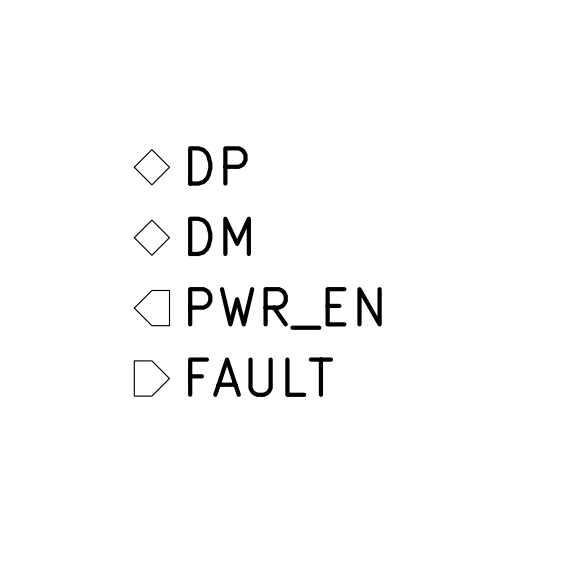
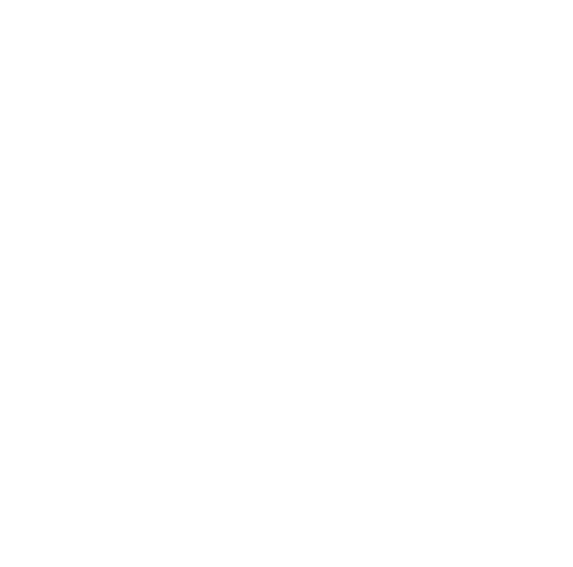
hierarchical label: DP (217, 165) -> none
hierarchical label: DM (219, 236) -> none
hierarchical label: PWR_EN (284, 308) -> none
hierarchical label: FAULT (260, 377) -> none

